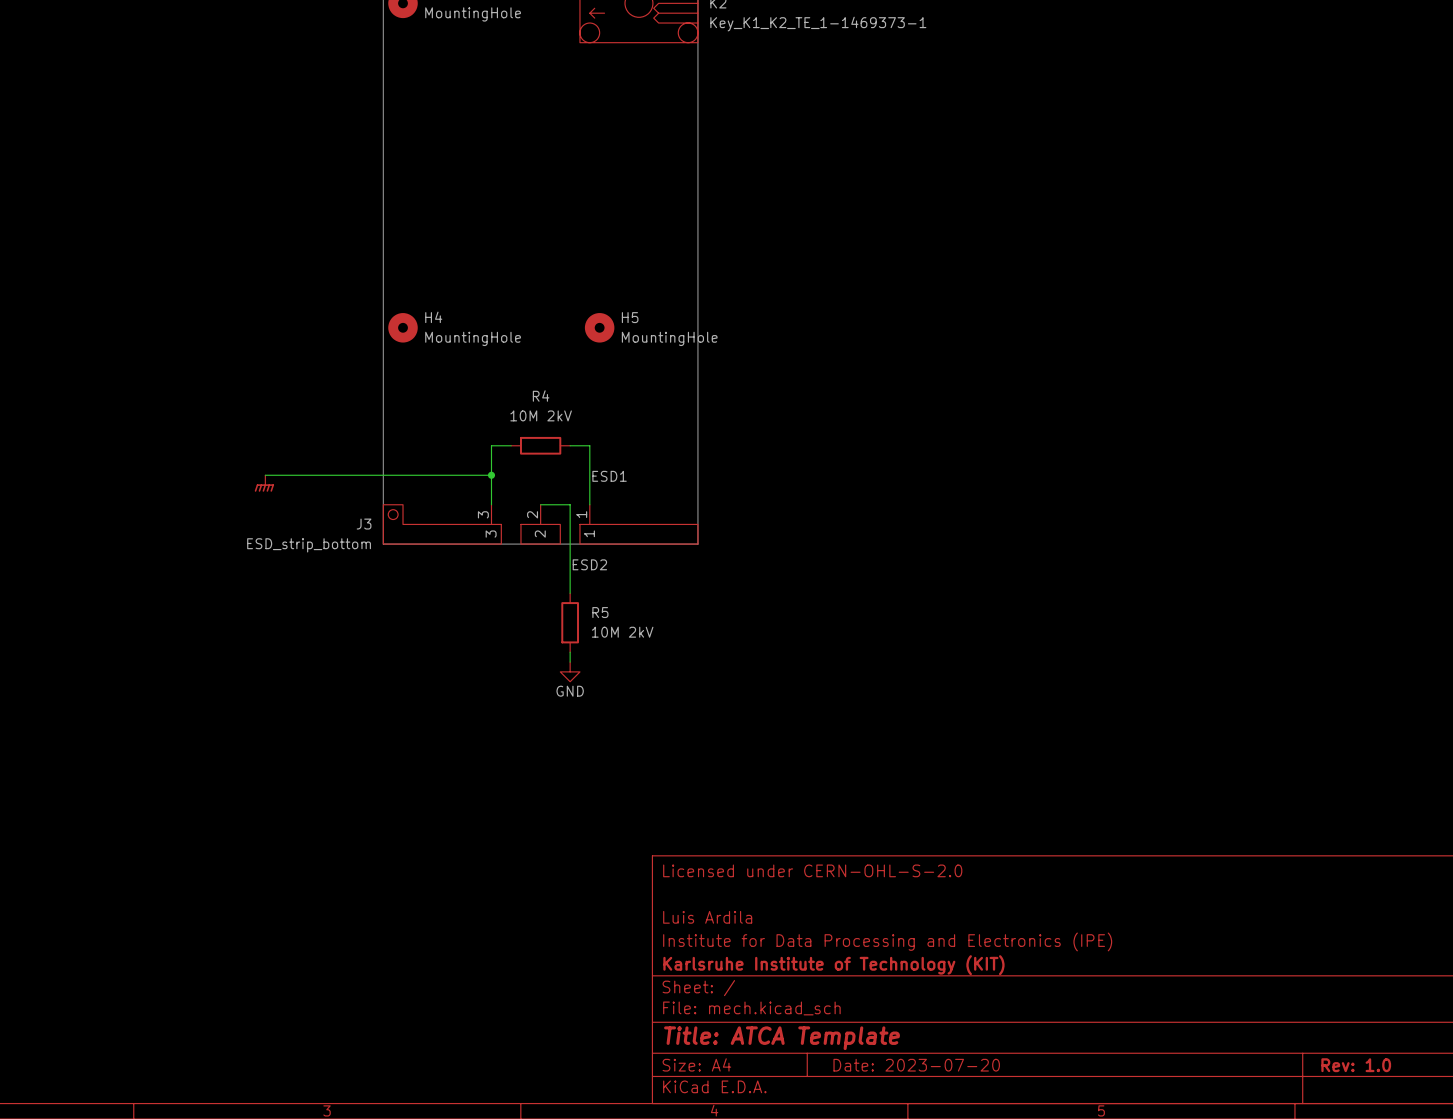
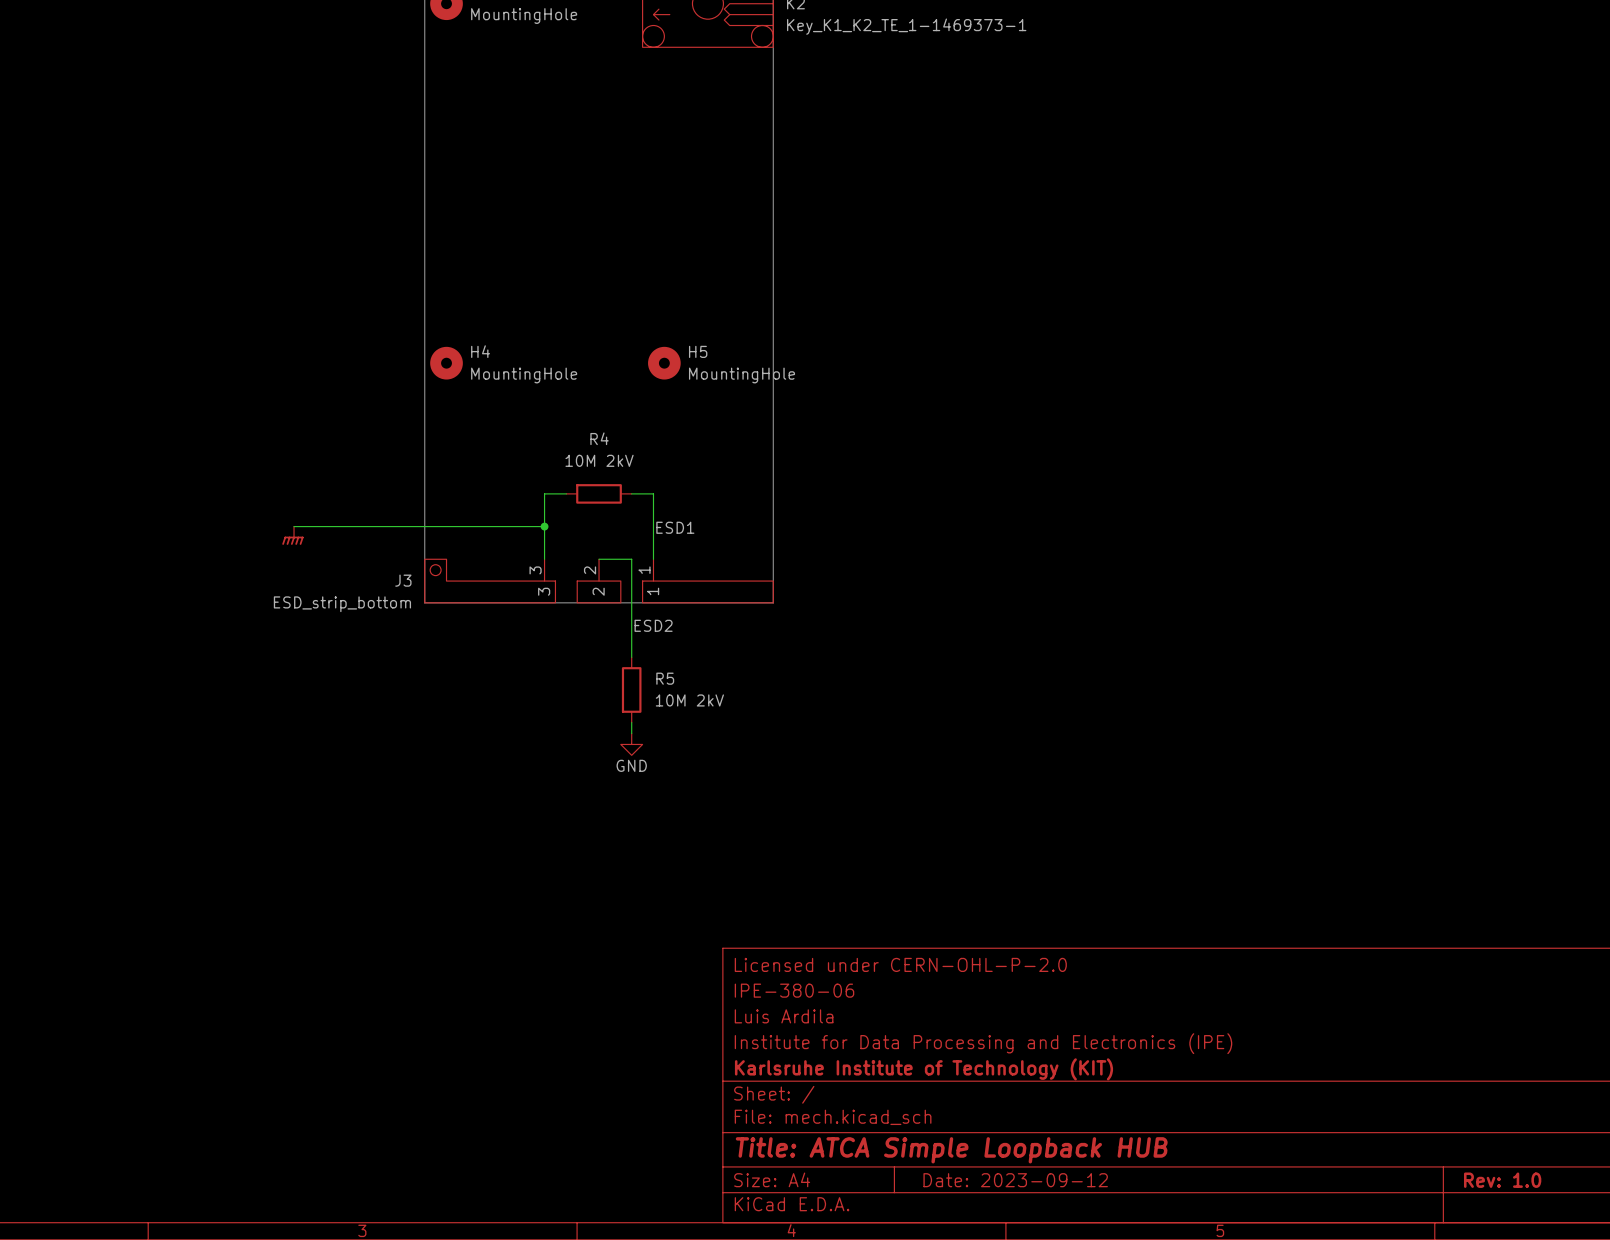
title block: Licensed under CERN-OHL-S-2.0 (812, 870) -> Licensed under CERN-OHL-P-2.0 (900, 964)
title block: none -> IPE-380-06 (794, 990)
title block: Title: ATCA Template (782, 1038) -> Title: ATCA Simple Loopback HUB (951, 1150)
title block: Date: 2023-07-20 (916, 1065) -> Date: 2023-09-12 (1015, 1180)

